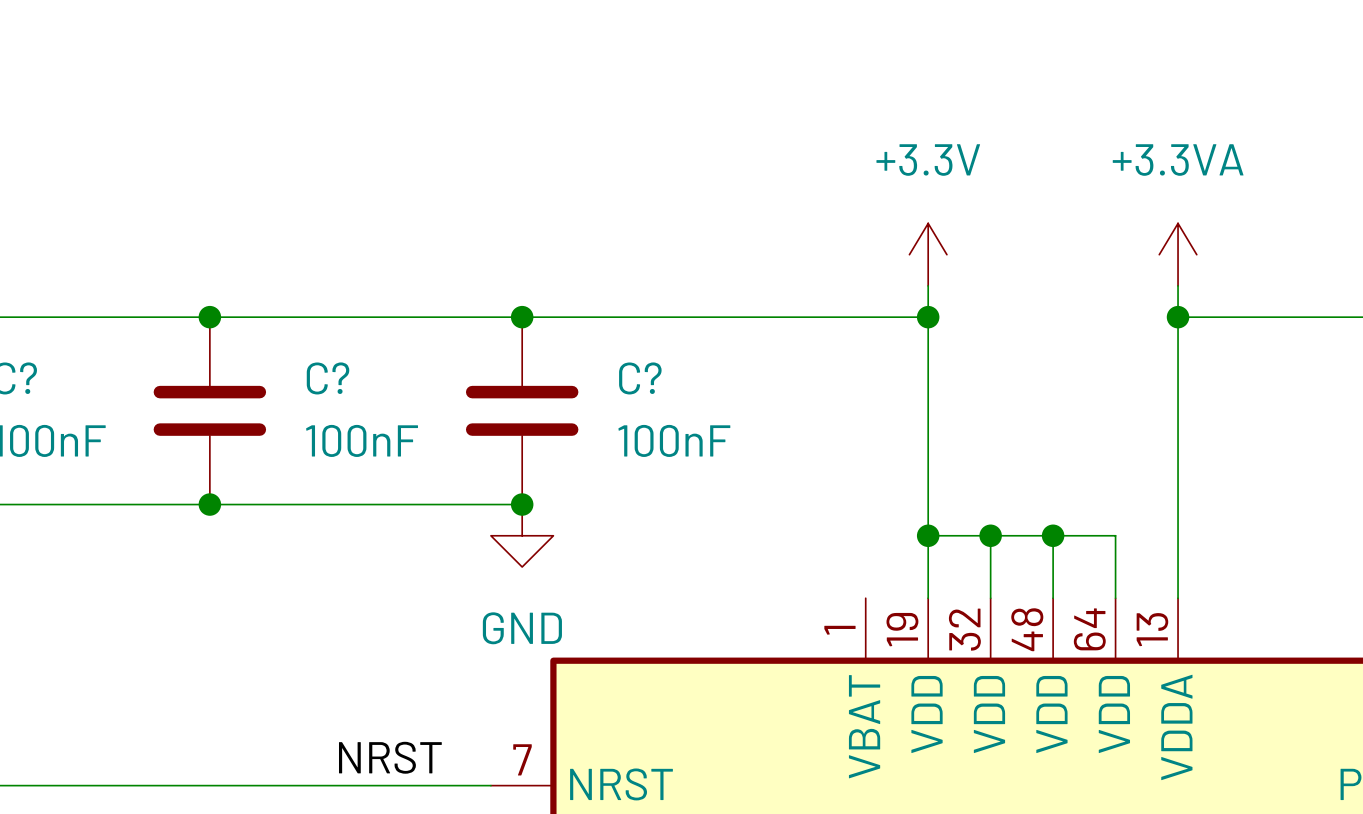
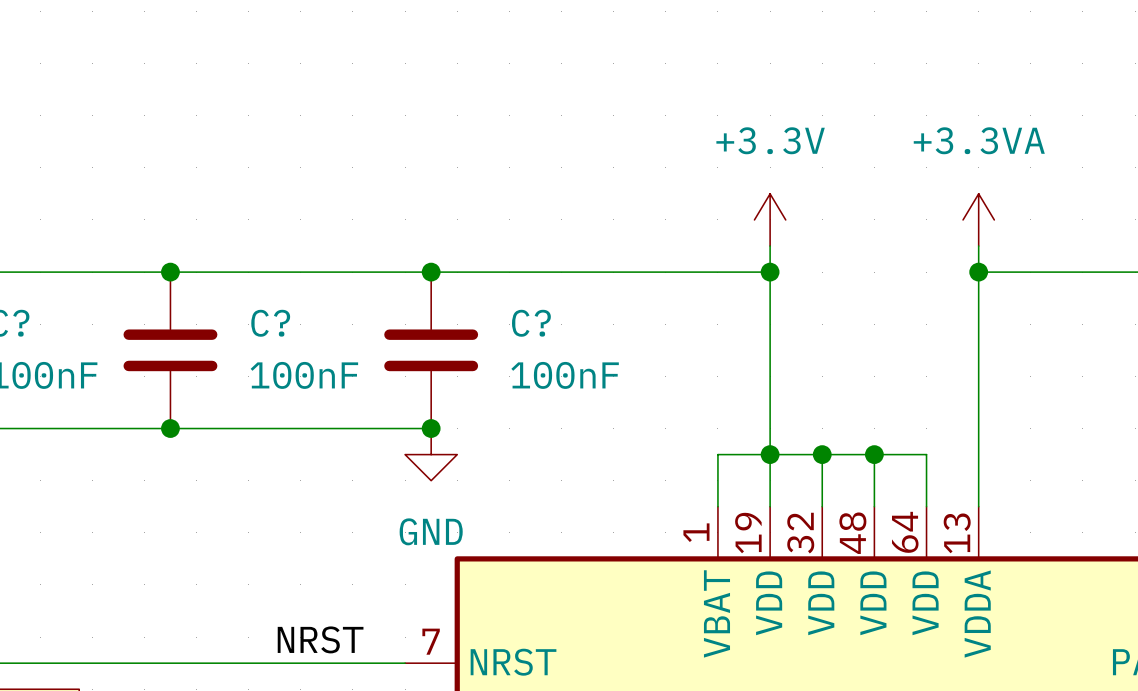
wire: none -> (770, 454) (717, 454) (717, 506)

